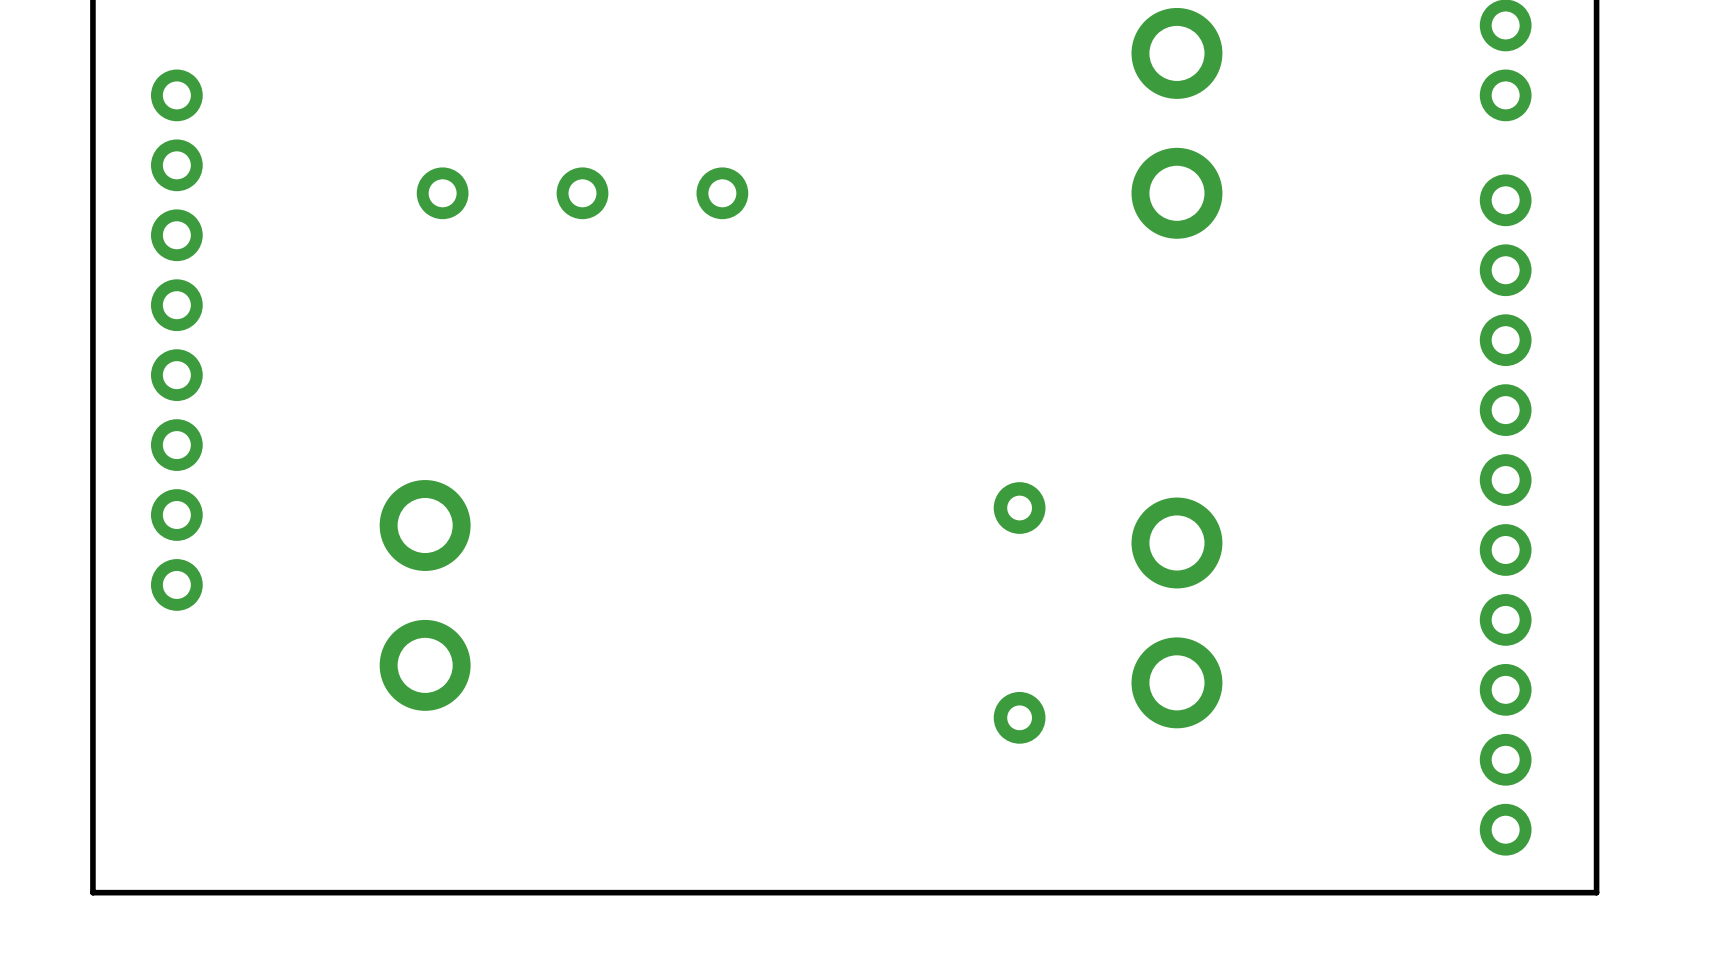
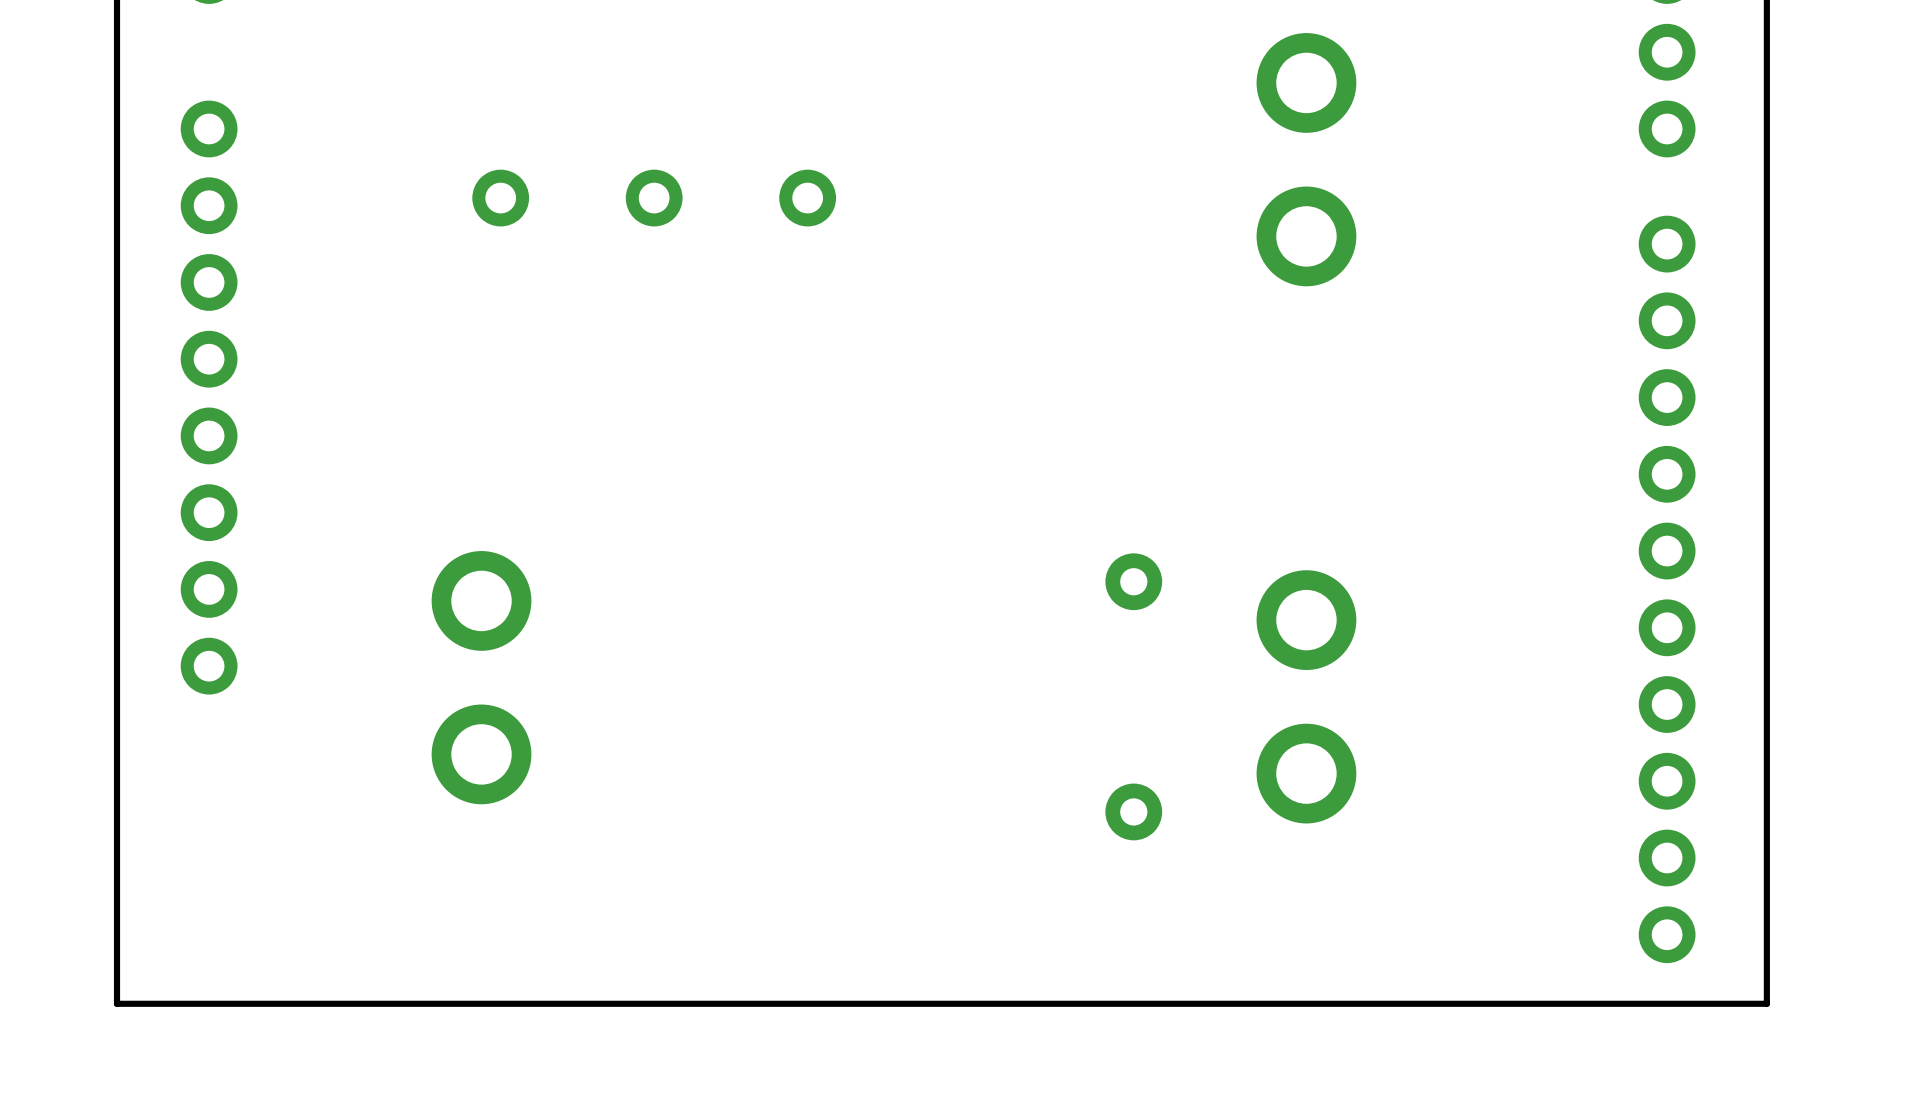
part position: (442, 193) -> (500, 198)
part position: (582, 193) -> (654, 198)
part position: (722, 193) -> (807, 198)

